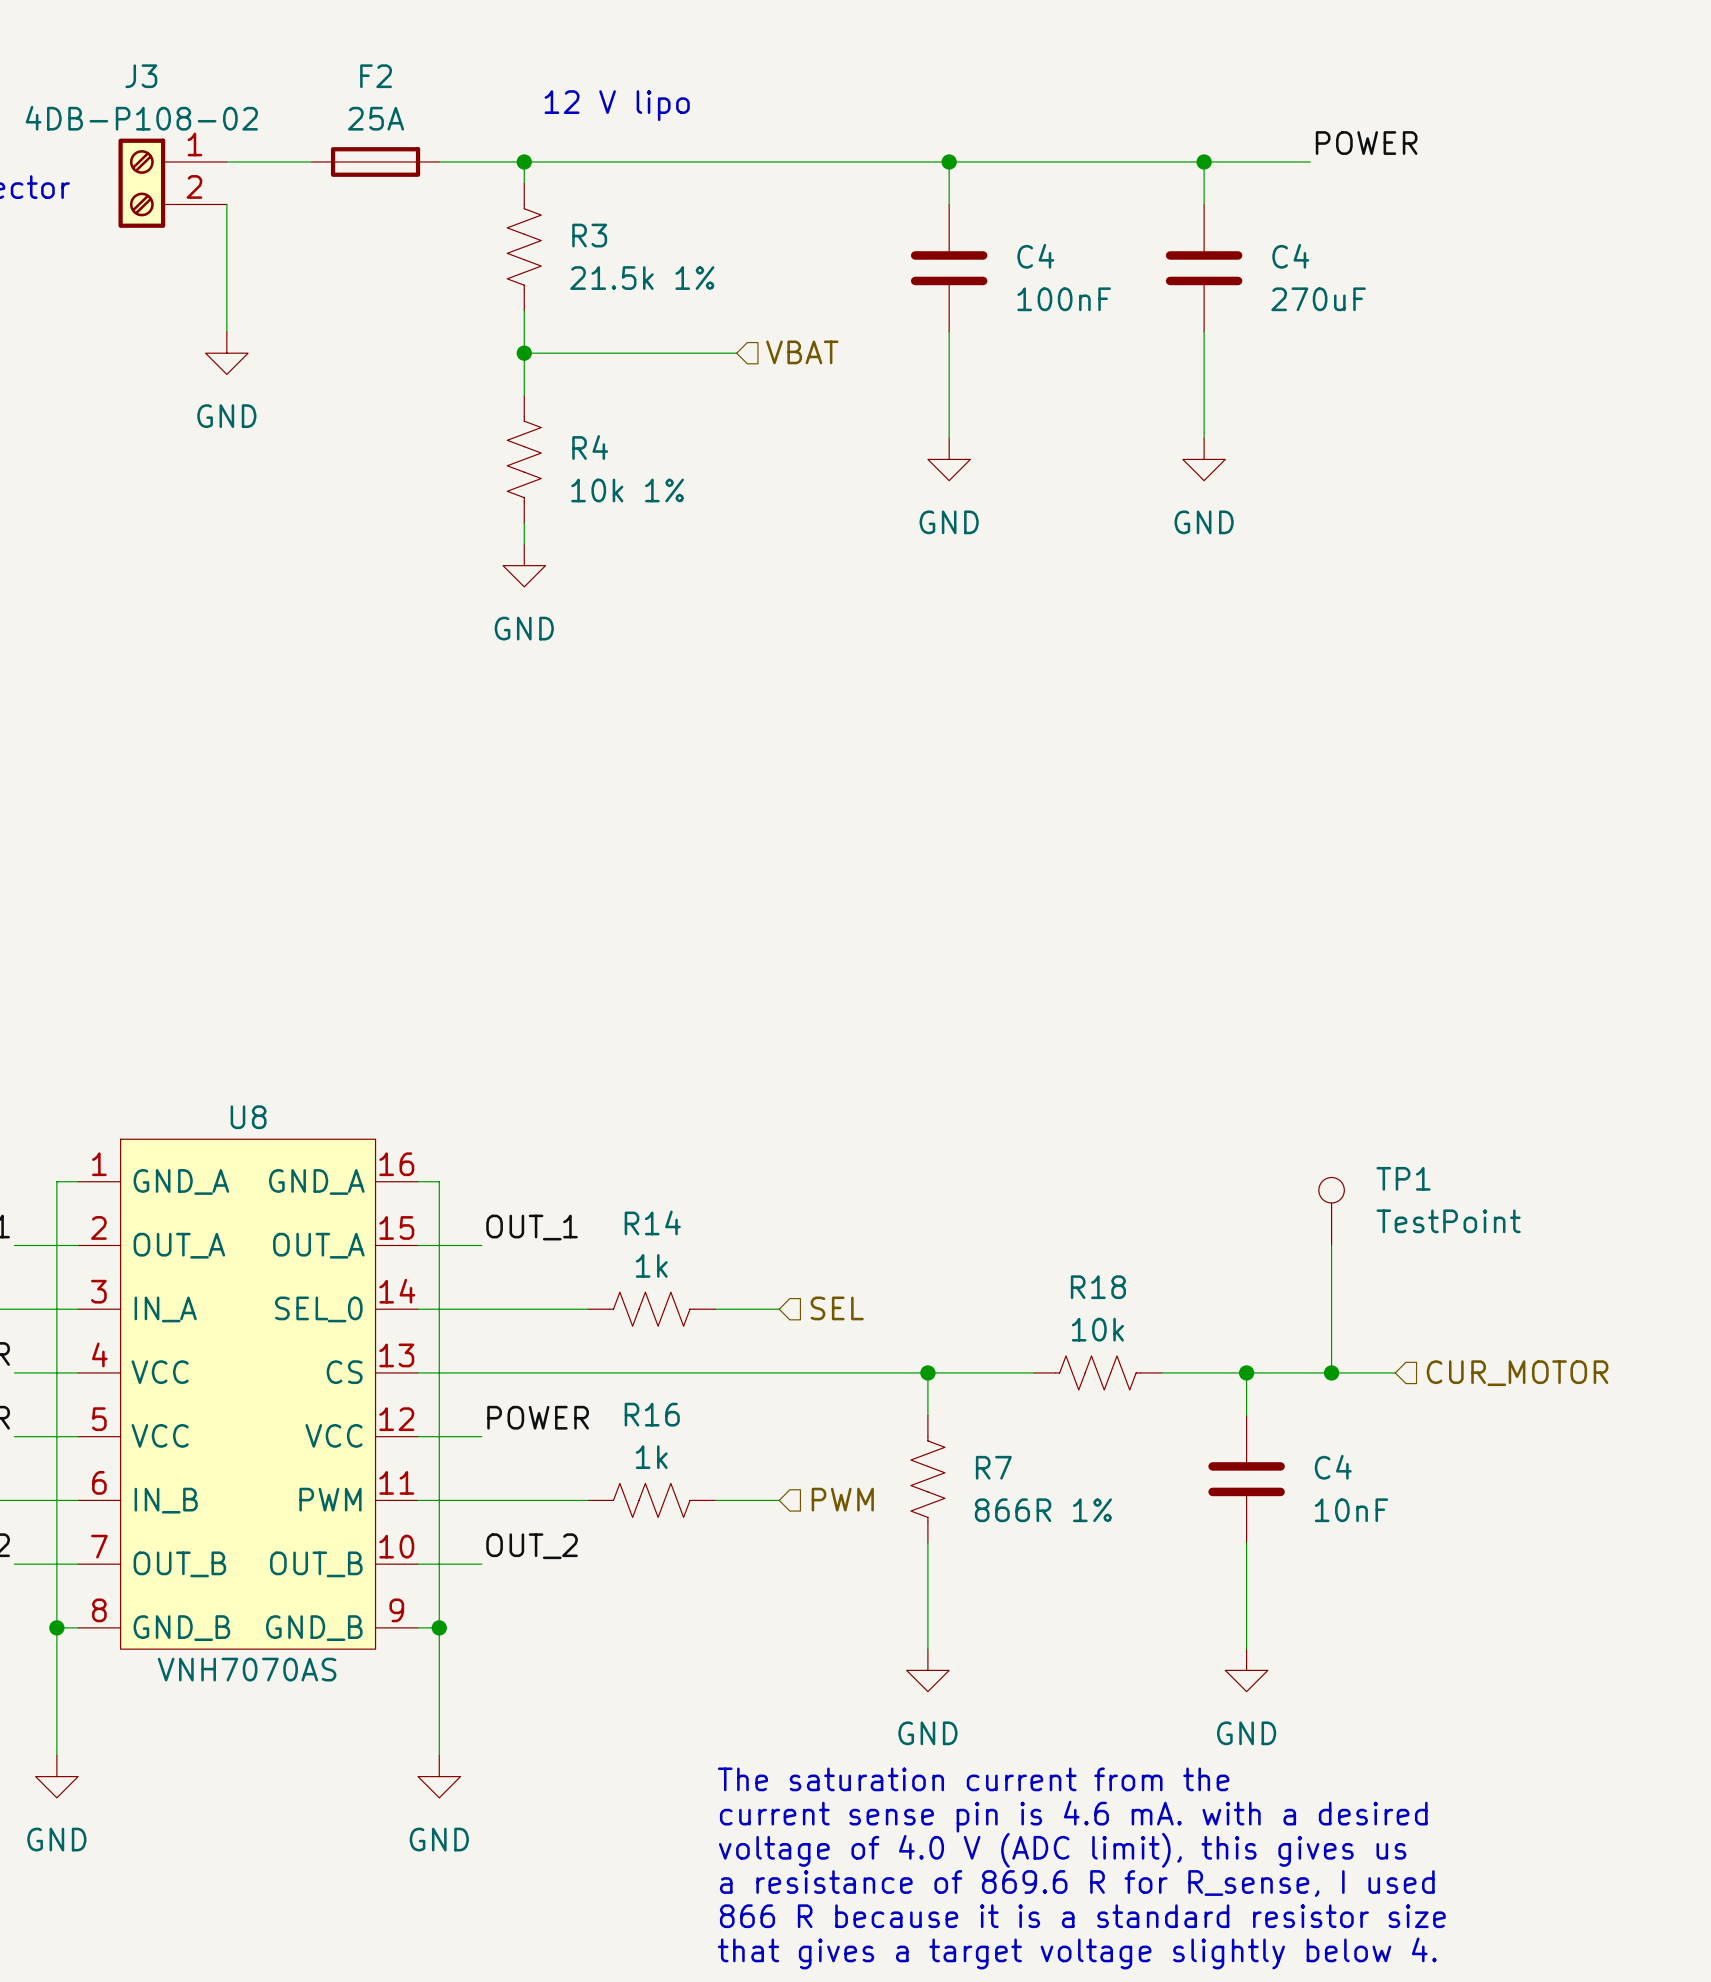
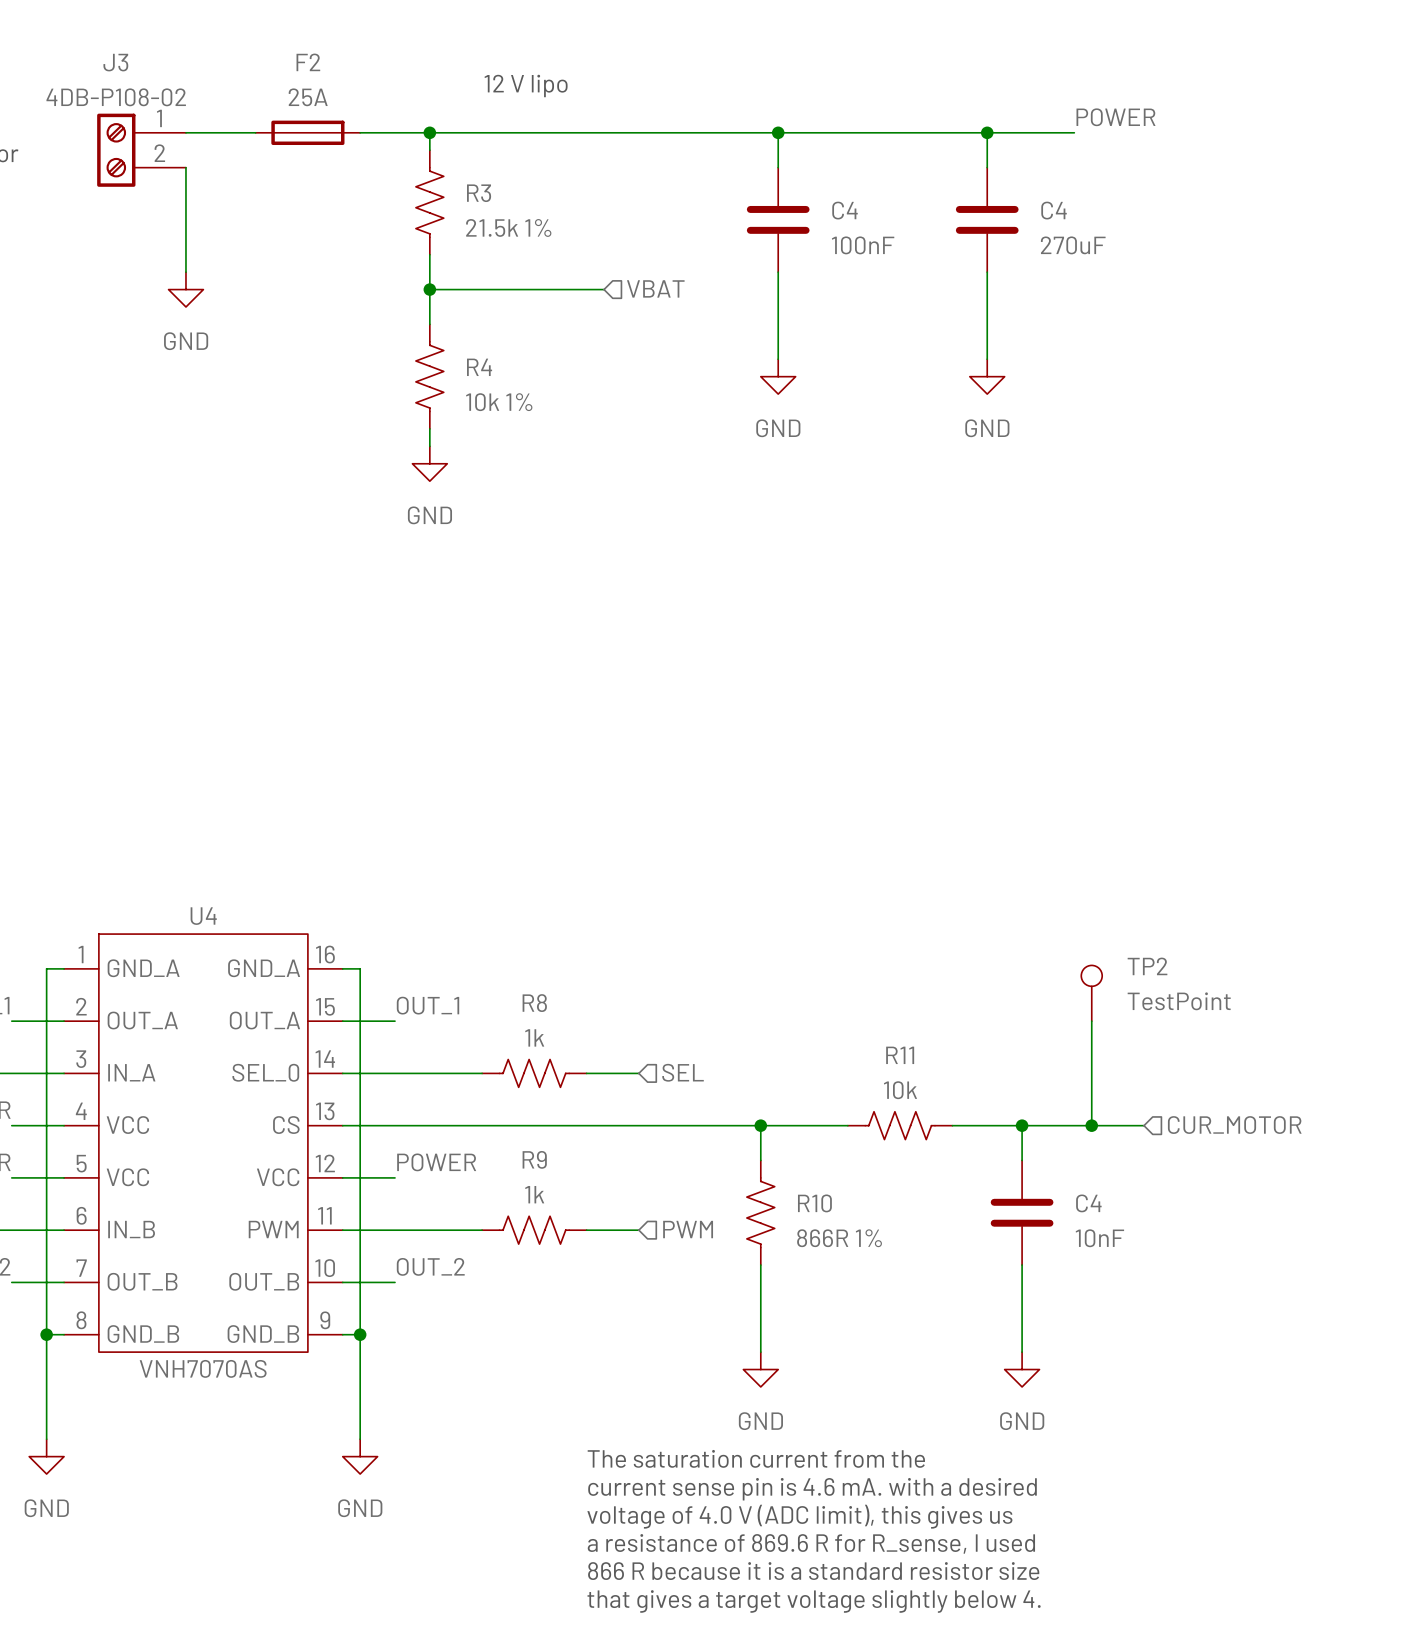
U8 name: U8 (248, 1117) -> U4 (203, 916)
TP1 name: TP1 (1403, 1178) -> TP2 (1147, 966)
R14 name: R14 (652, 1222) -> R8 (534, 1003)
R18 name: R18 (1098, 1287) -> R11 (900, 1055)
R16 name: R16 (652, 1414) -> R9 (534, 1159)
R7 name: R7 (993, 1467) -> R10 (814, 1203)

